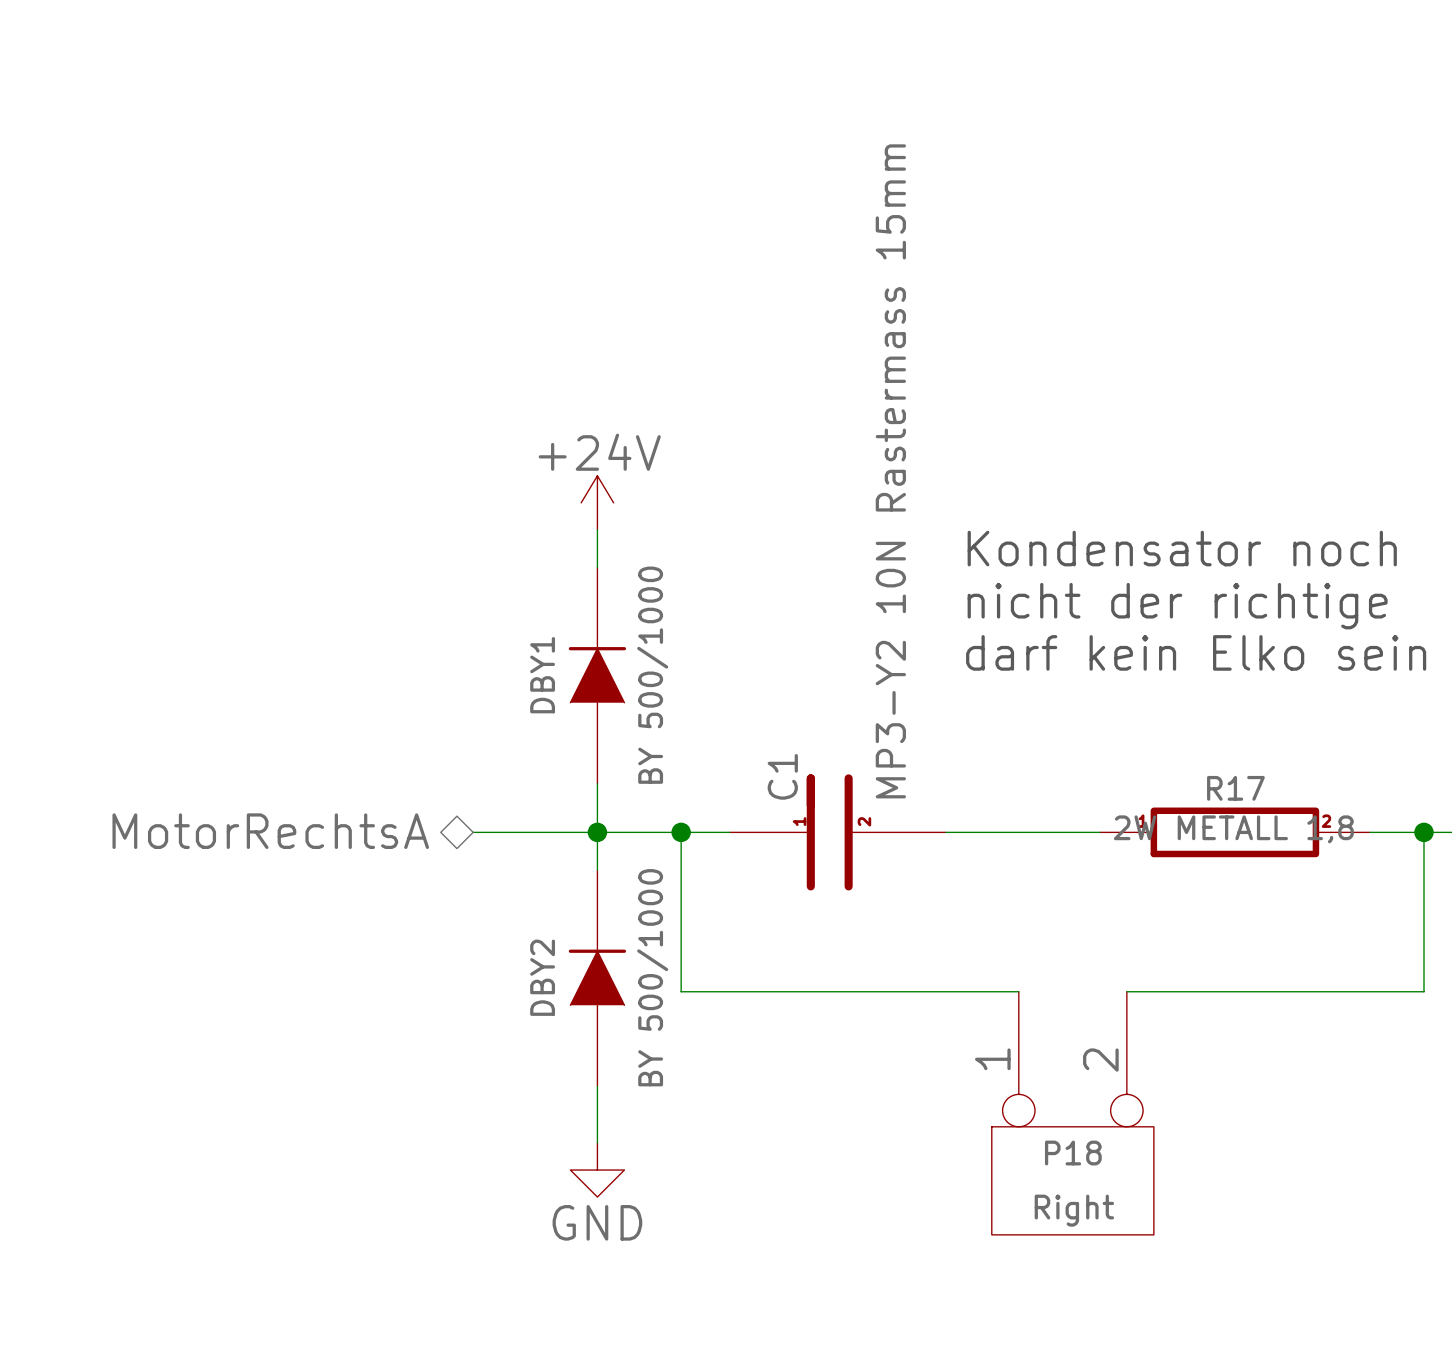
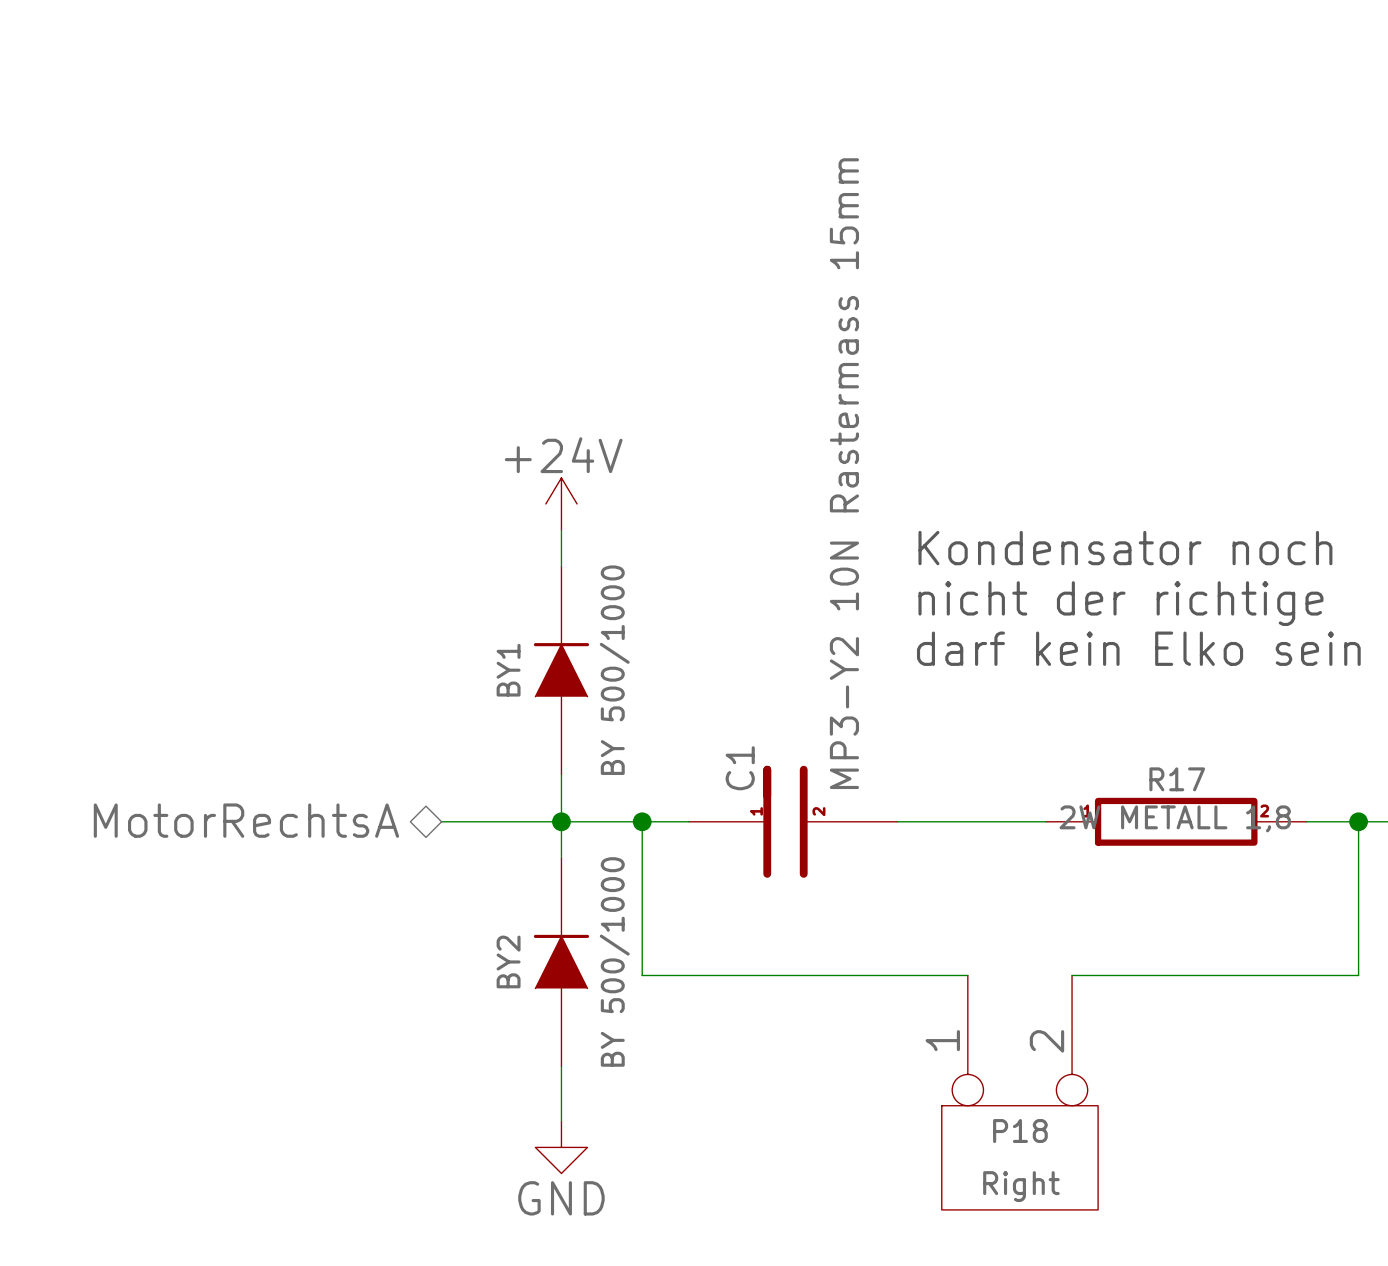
DBY1 name: DBY1 (542, 675) -> BY1 (508, 670)
DBY2 name: DBY2 (542, 977) -> BY2 (508, 961)

